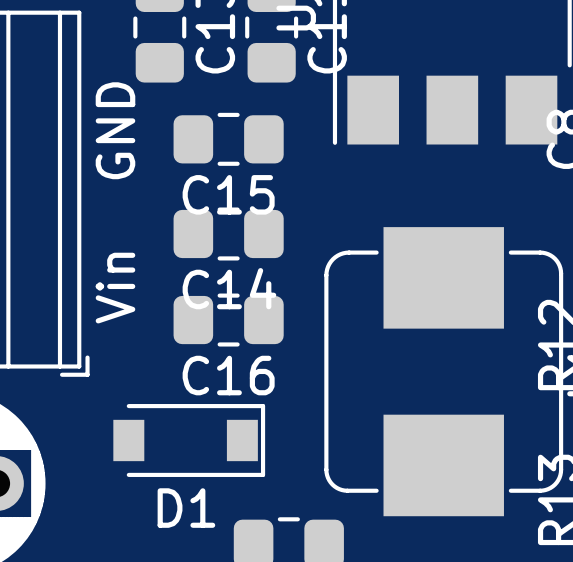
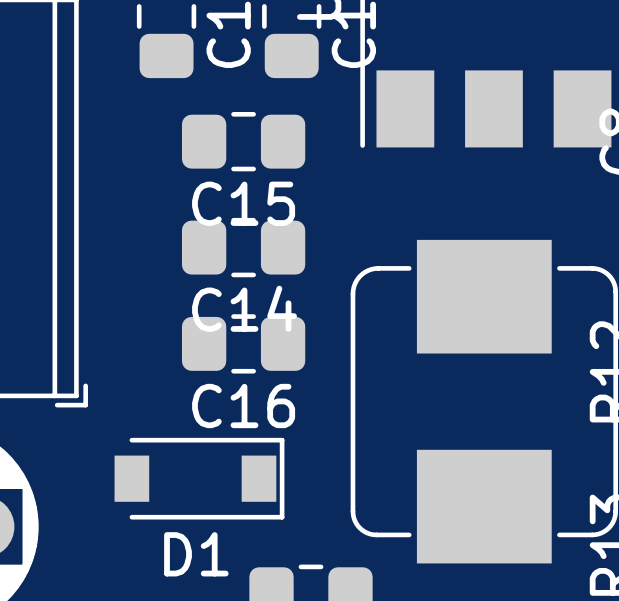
text: GND (115, 130) -> none
text: Vin (115, 288) -> none

